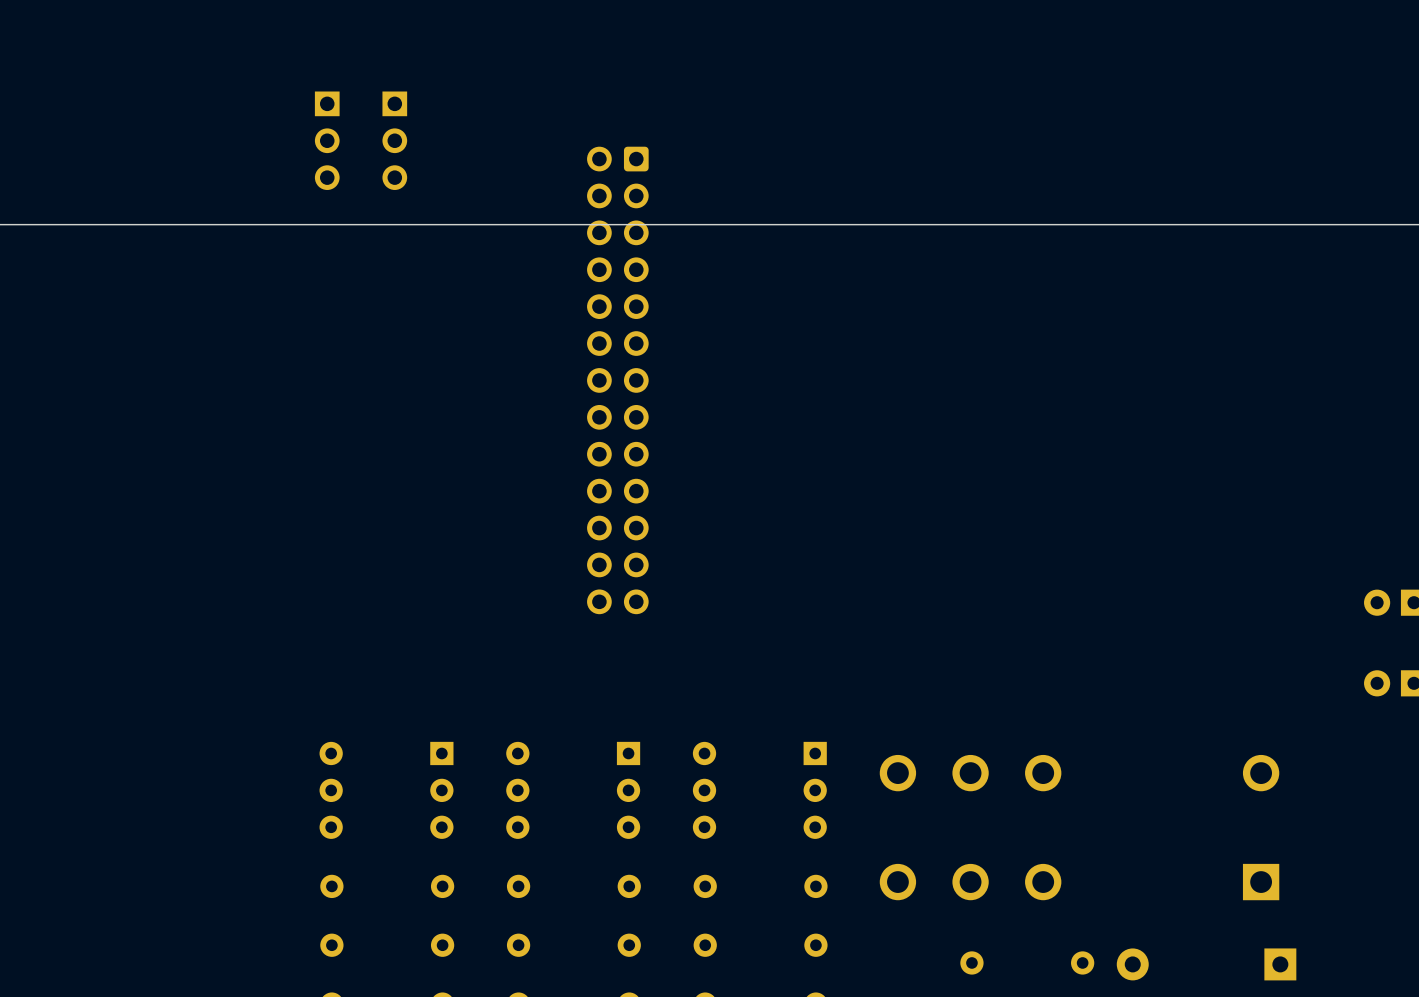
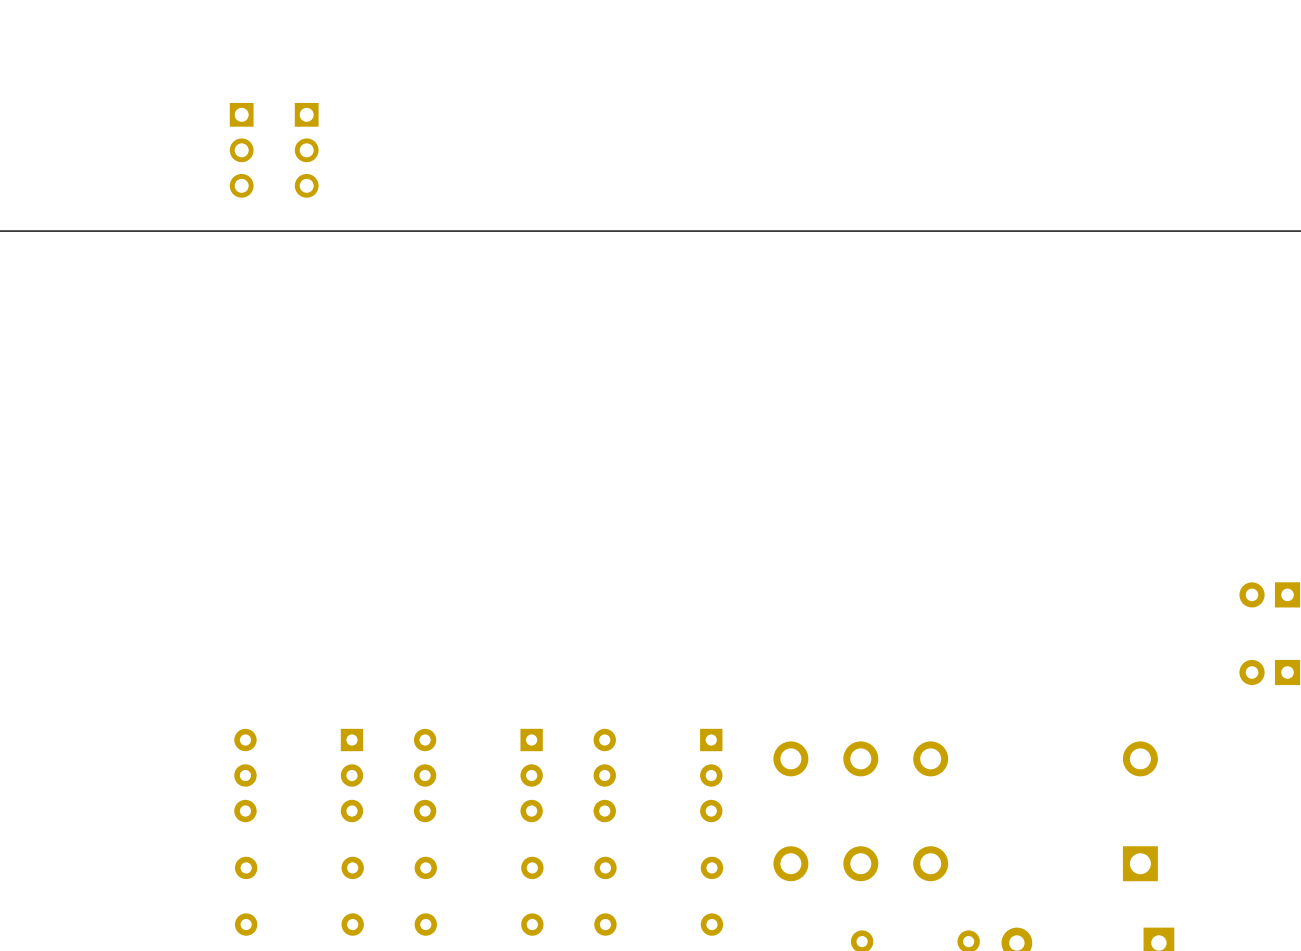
part: (617, 380) -> none

